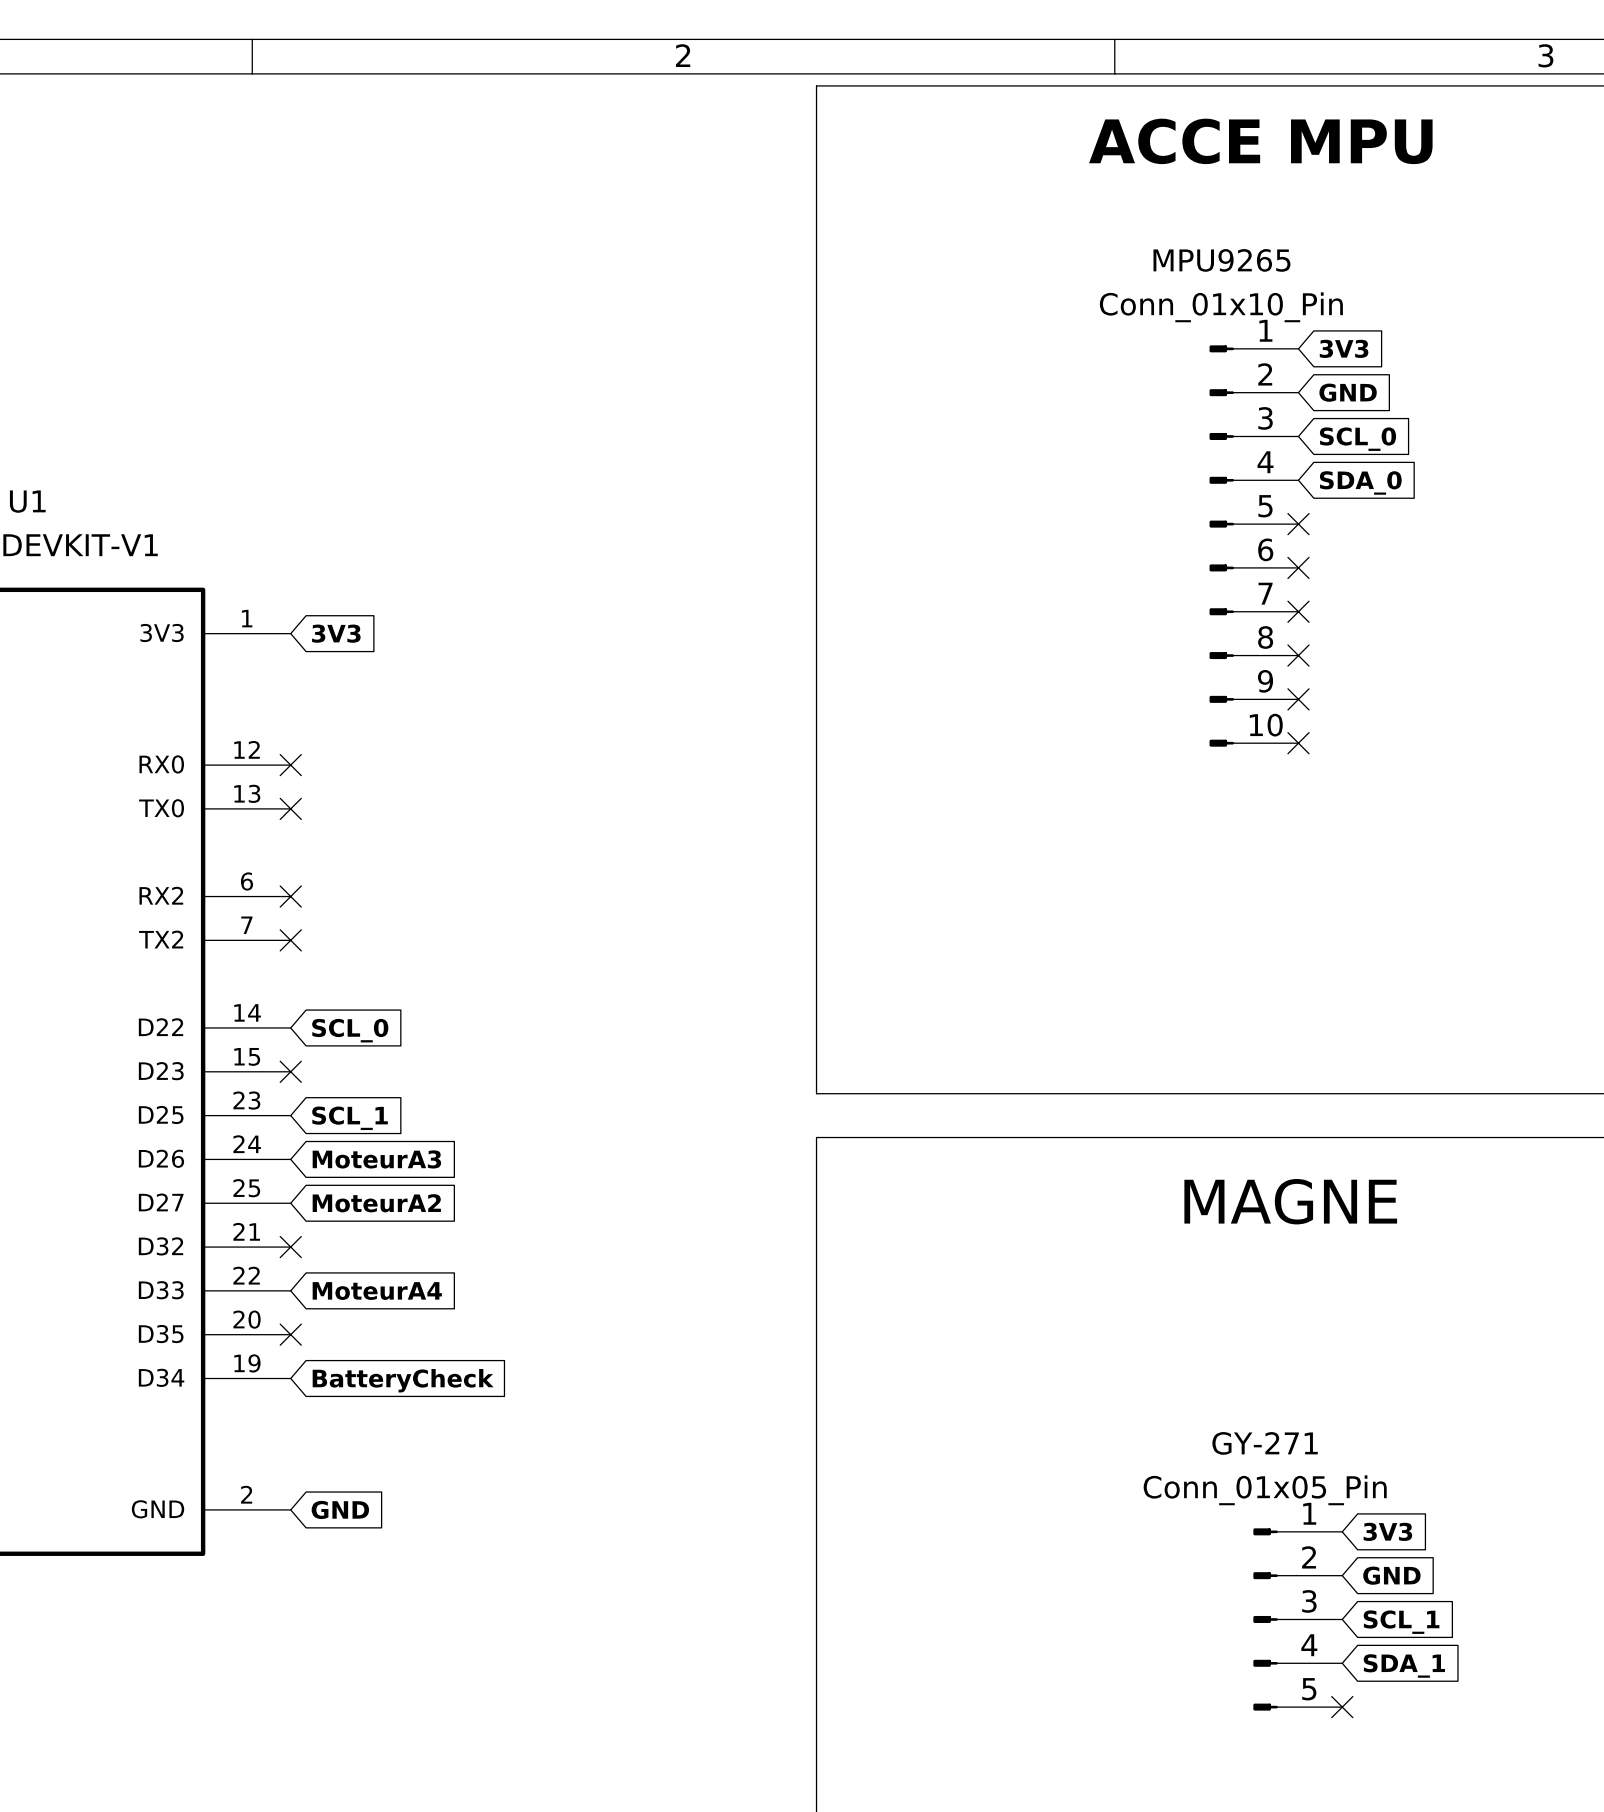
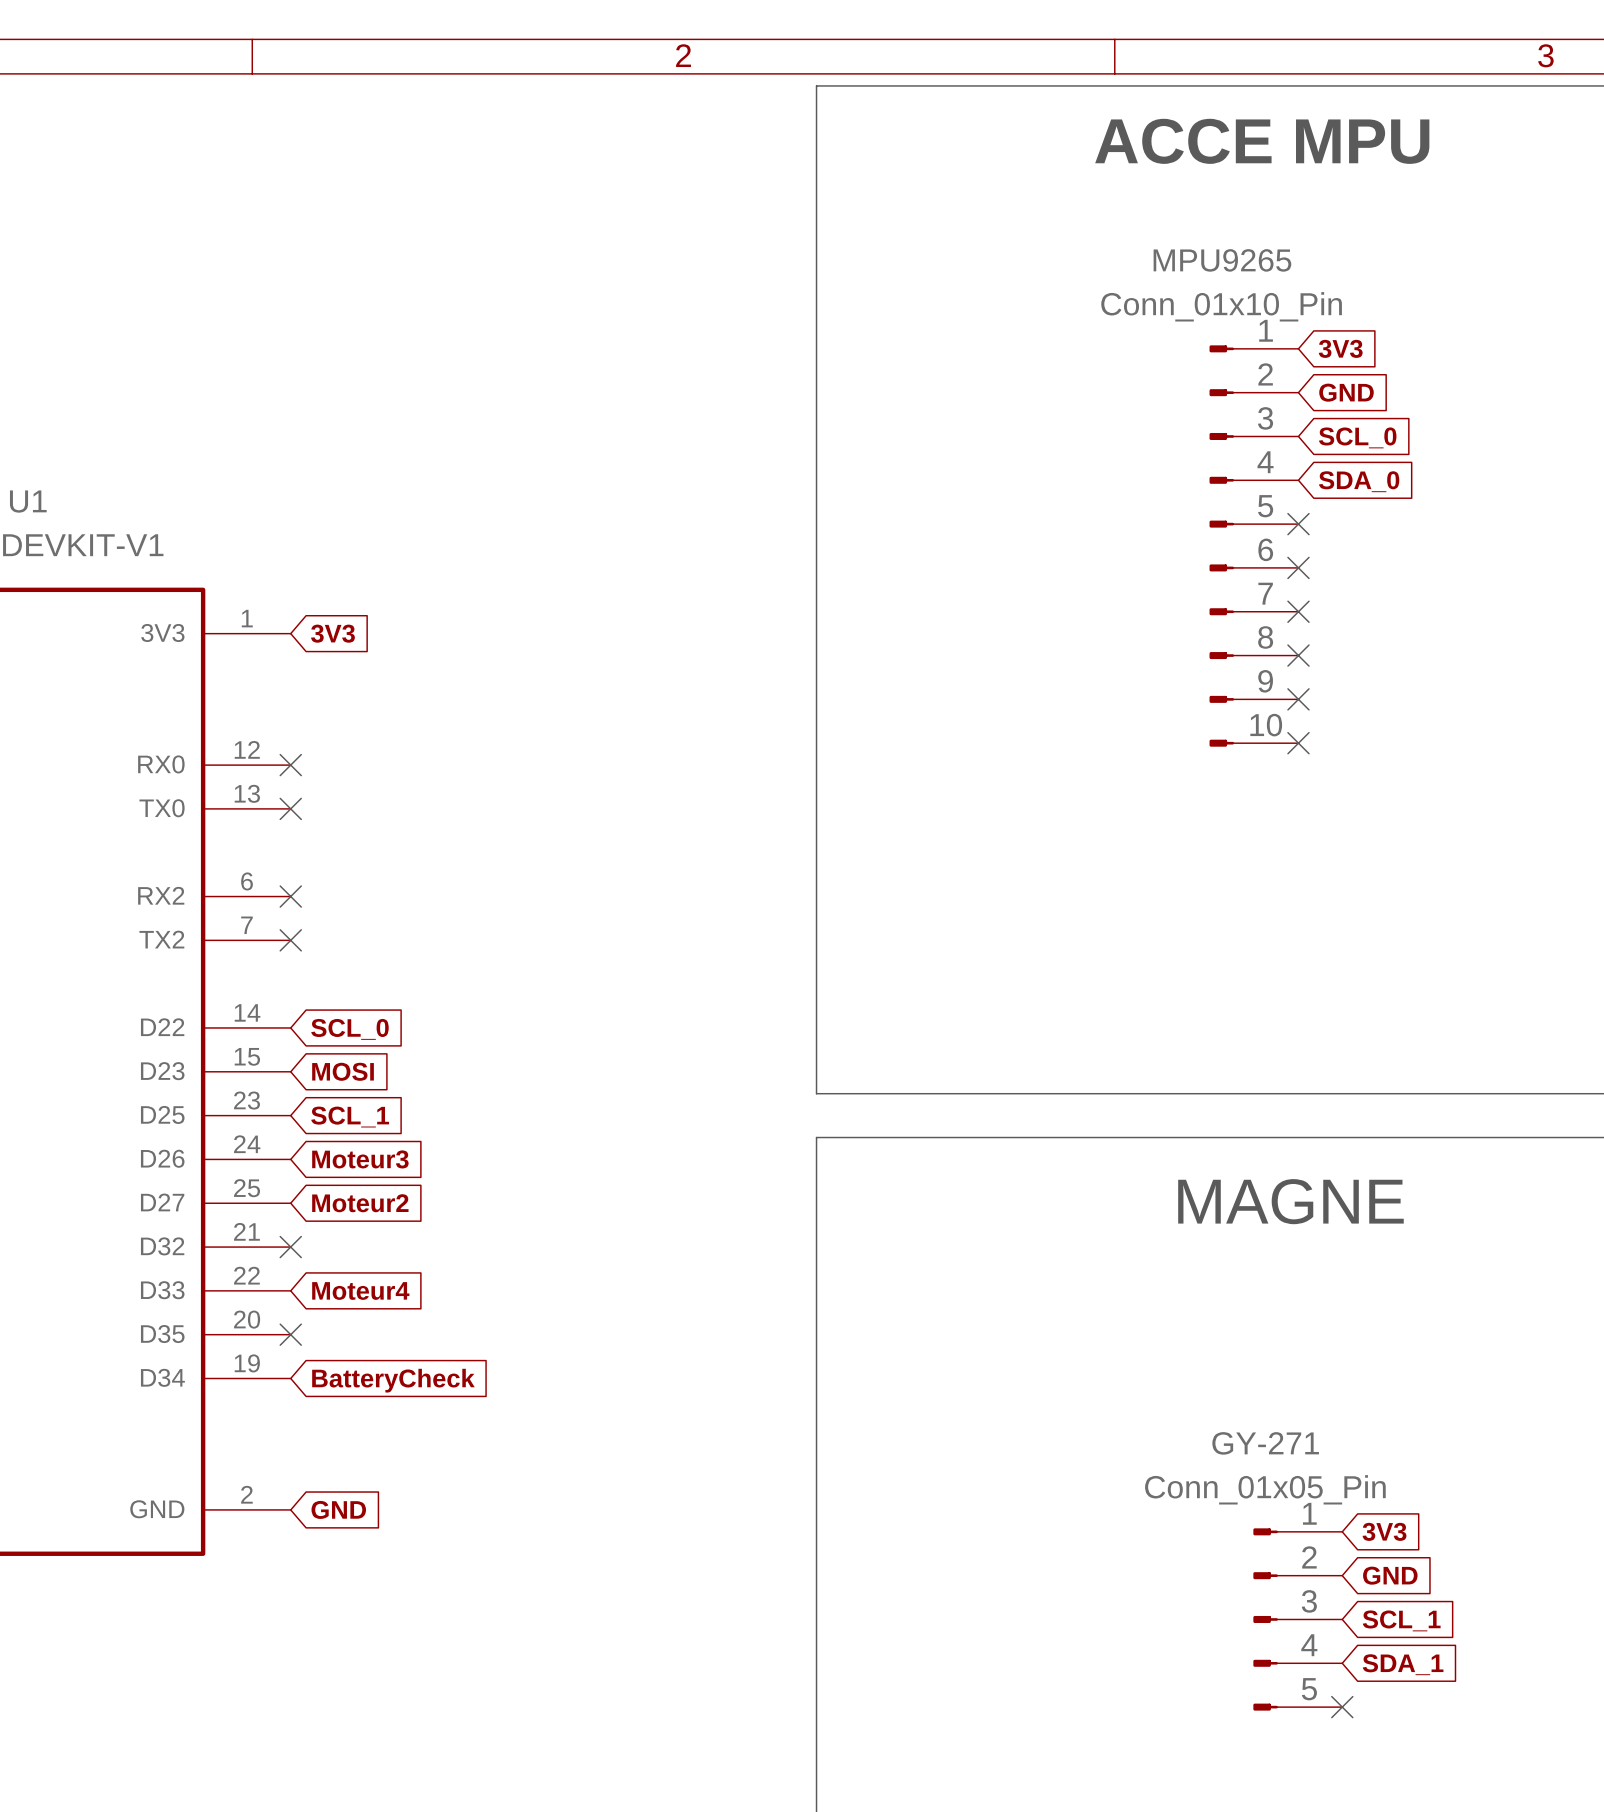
no-connect mark: (290, 1071) -> none
global label: none -> MOSI (343, 1071)
global label: MoteurA3 (376, 1159) -> Moteur3 (360, 1159)
global label: MoteurA2 (376, 1203) -> Moteur2 (360, 1203)
global label: MoteurA4 (377, 1291) -> Moteur4 (360, 1290)

